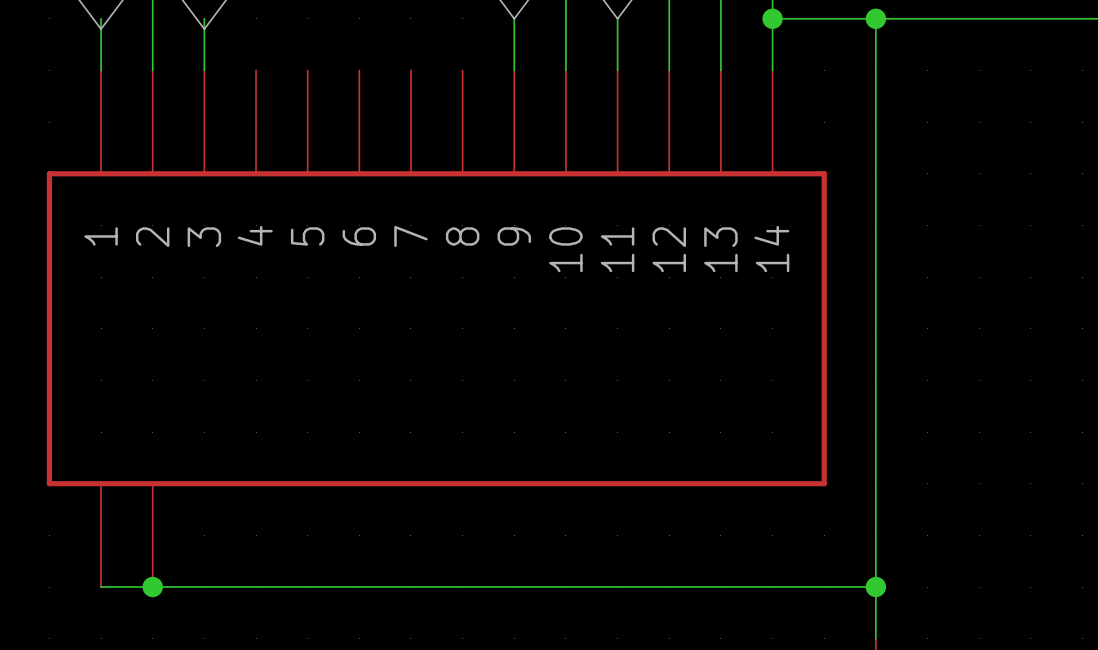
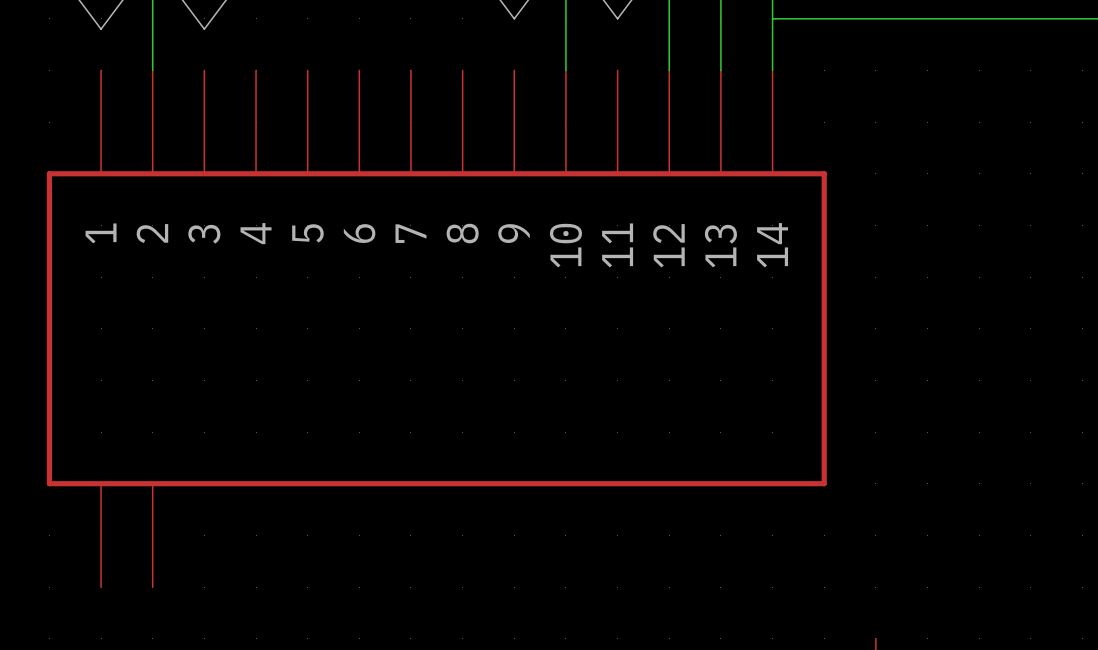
wire: (101, 18) (101, 70) -> none
wire: (204, 18) (204, 70) -> none
wire: (514, 18) (514, 70) -> none
wire: (617, 18) (617, 70) -> none
junction: (772, 18) -> none
wire: (875, 18) (875, 638) -> none
junction: (875, 18) -> none
wire: (101, 587) (875, 587) -> none
junction: (152, 587) -> none
junction: (875, 587) -> none

